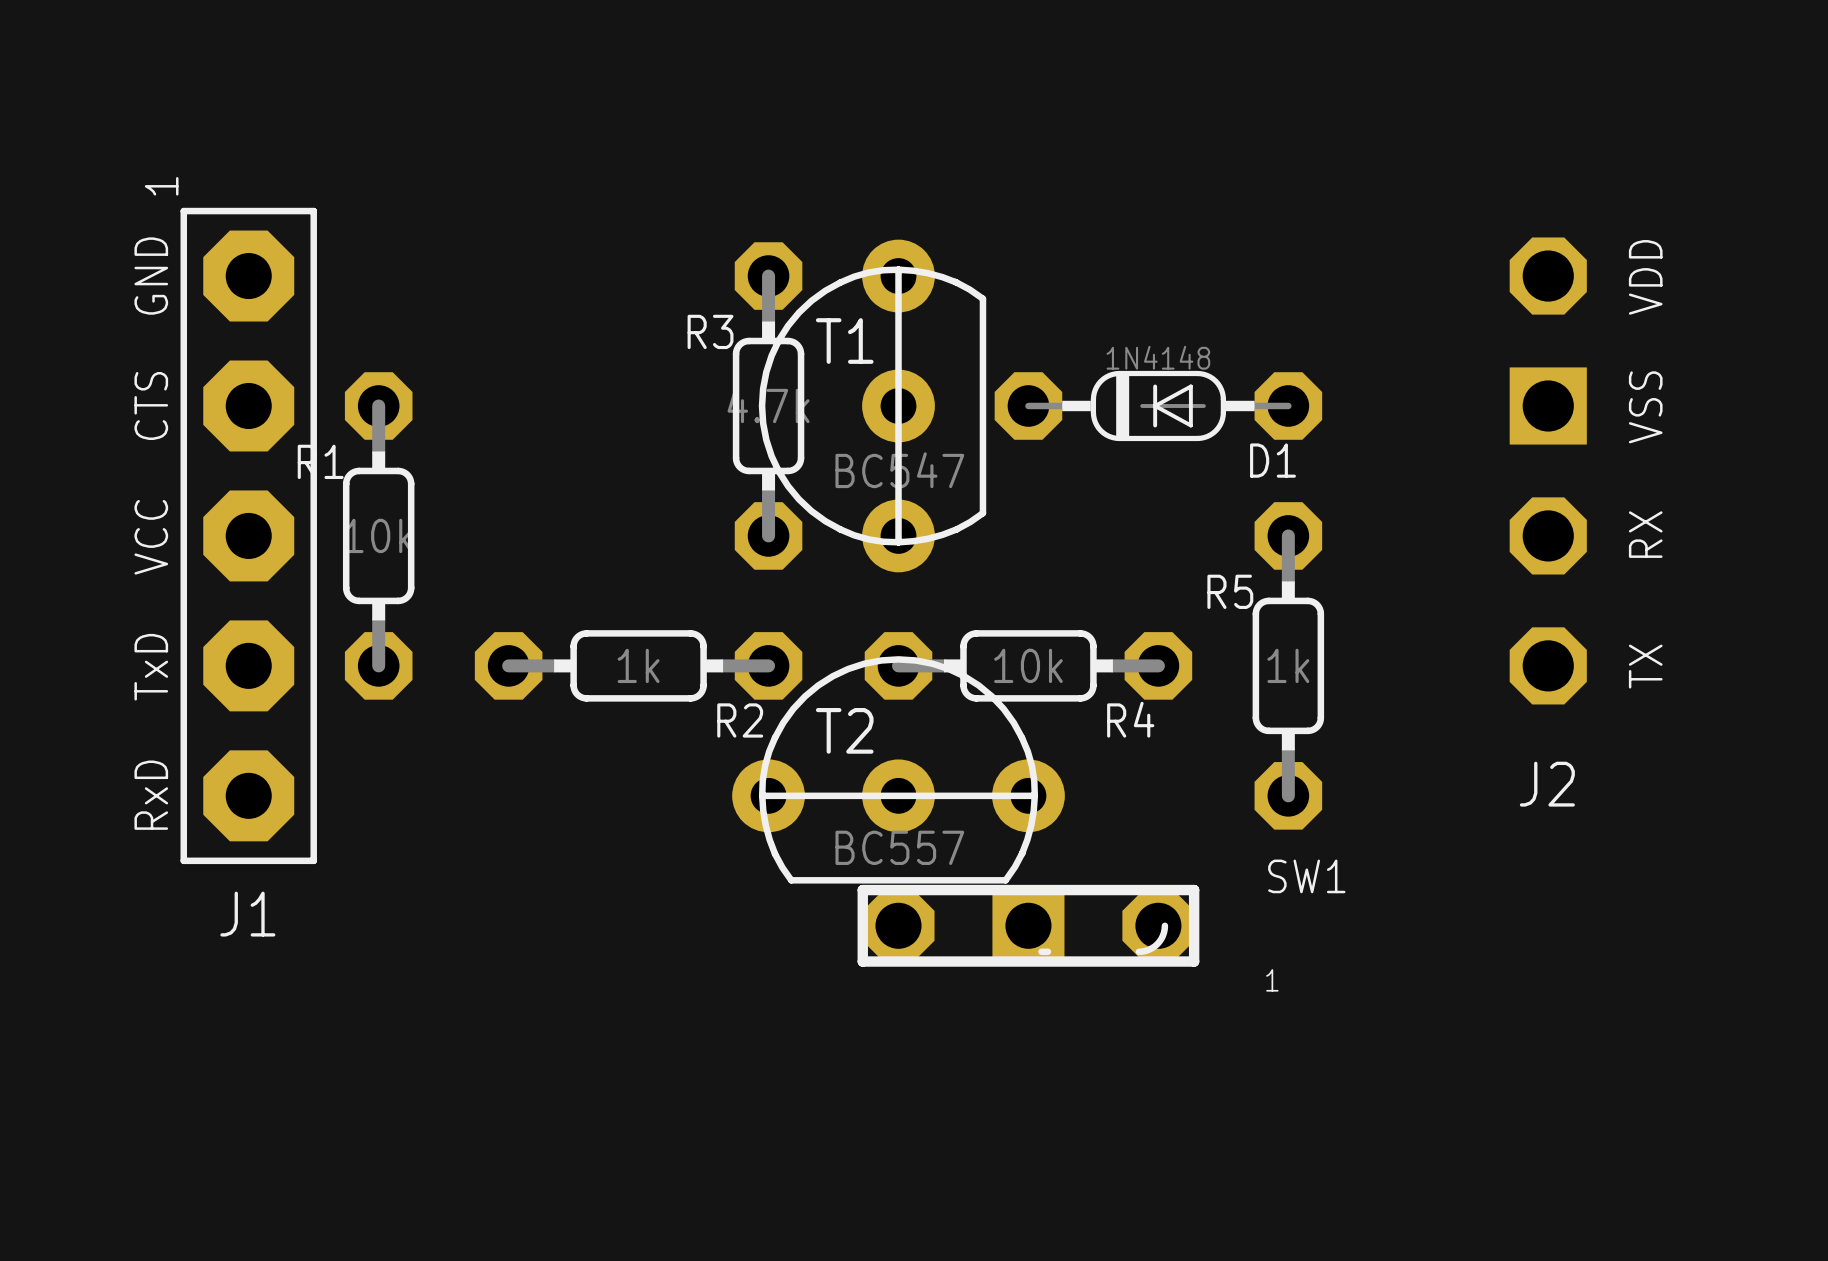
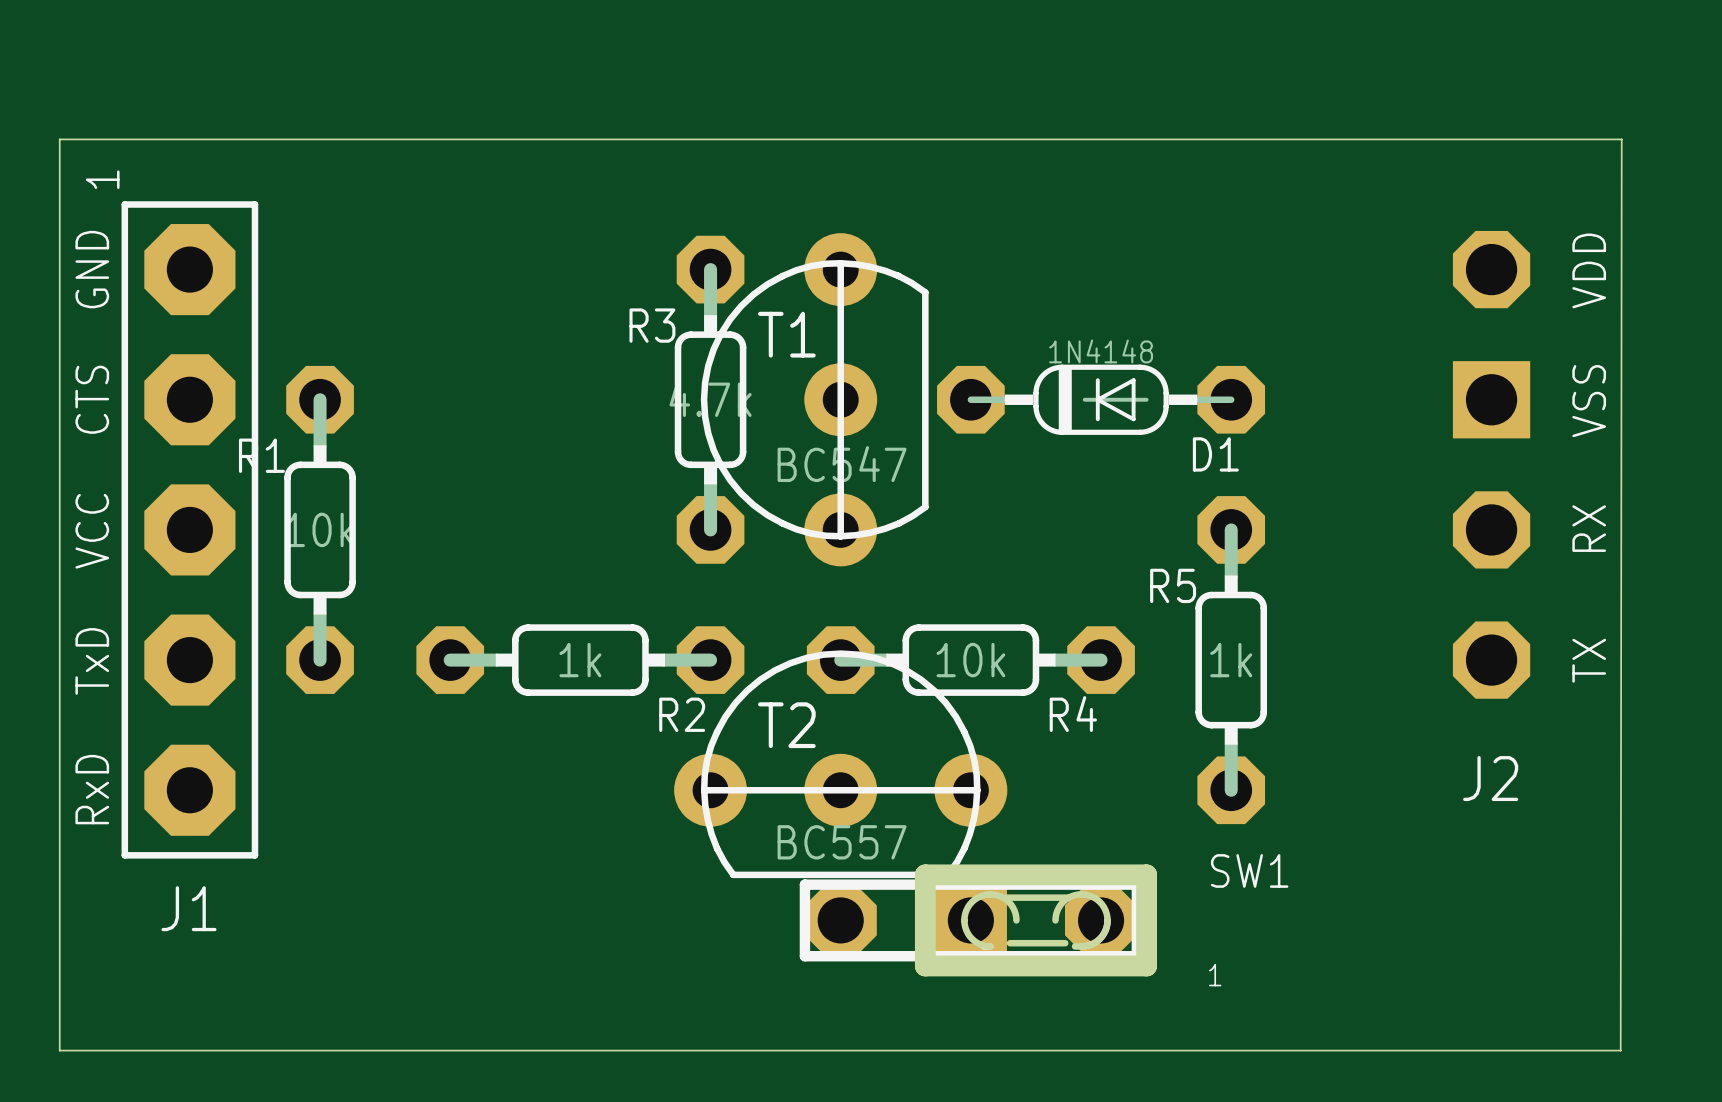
board edge: none -> (59, 139) (1621, 139) (1620, 1050) (59, 1050) (59, 139)
SW1 footprint: [857, 884, 1200, 967] -> [799, 864, 1158, 977]

